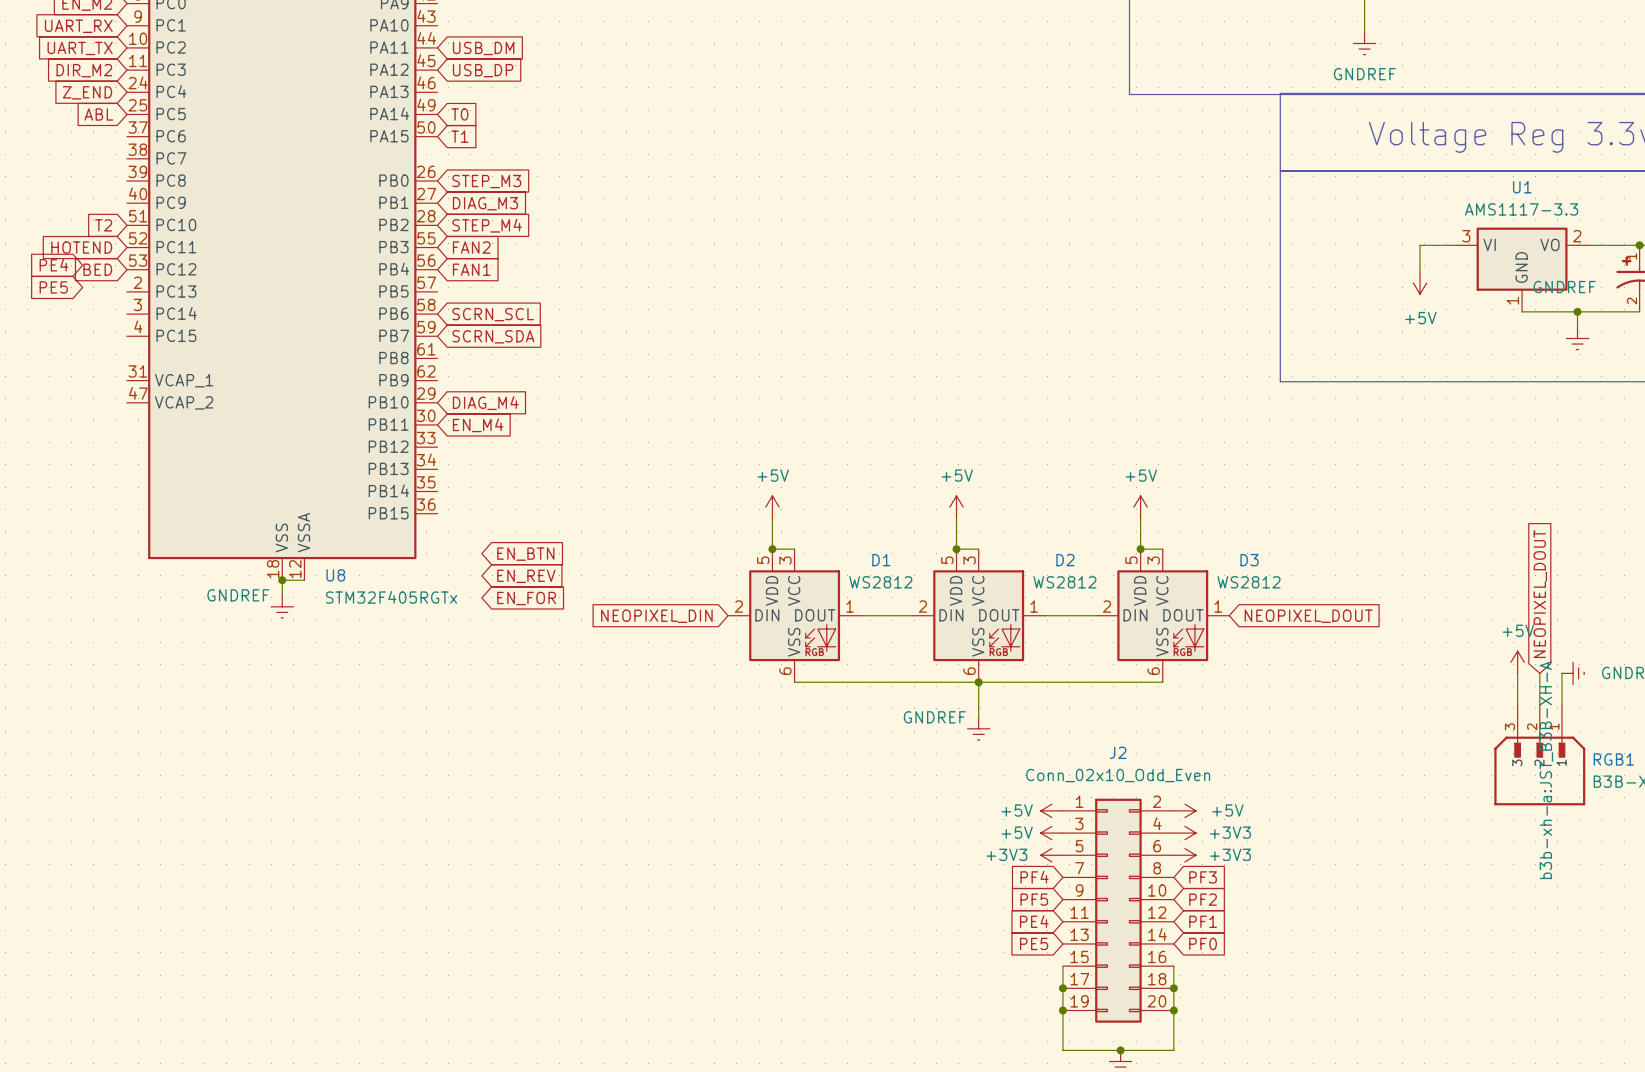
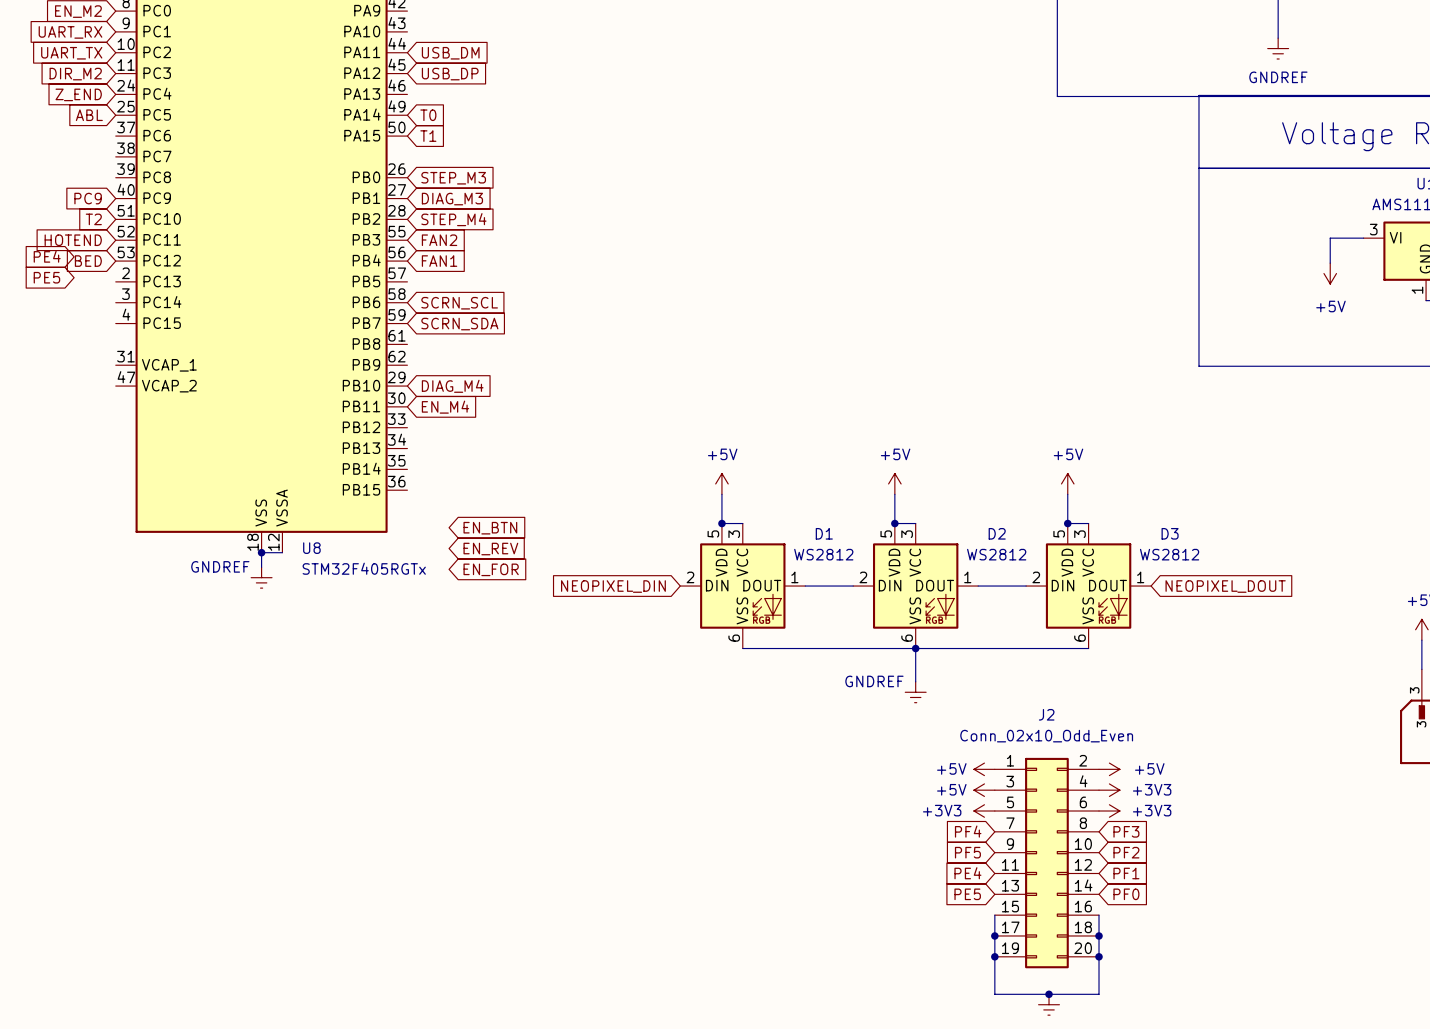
global label: none -> PC9 (88, 198)

